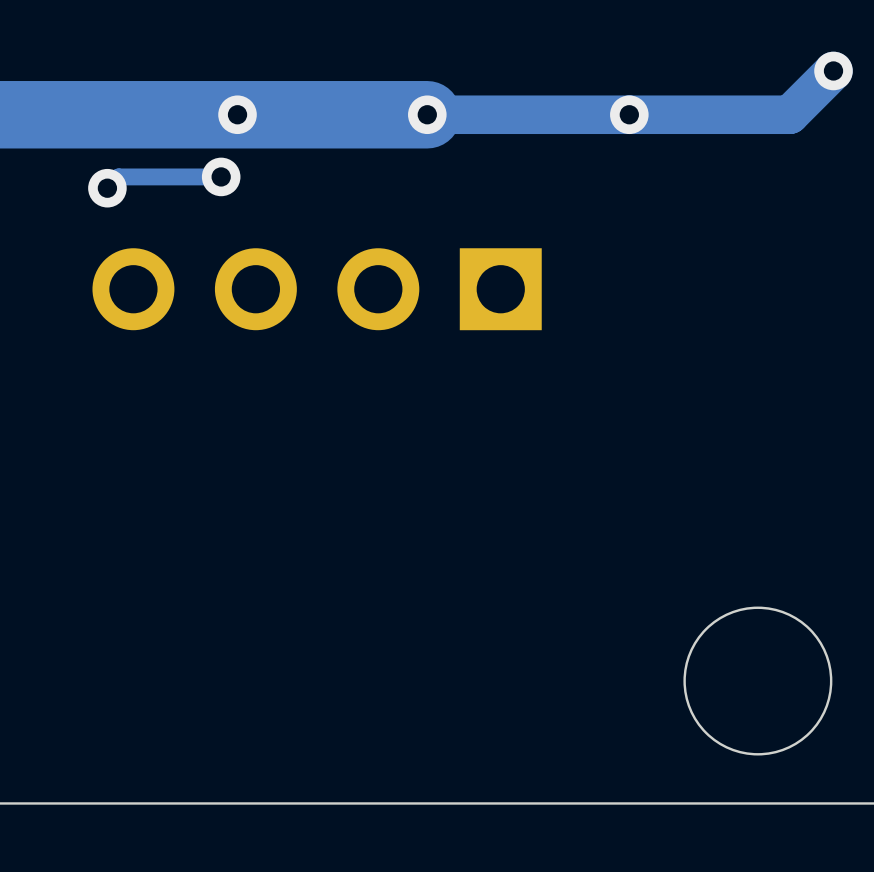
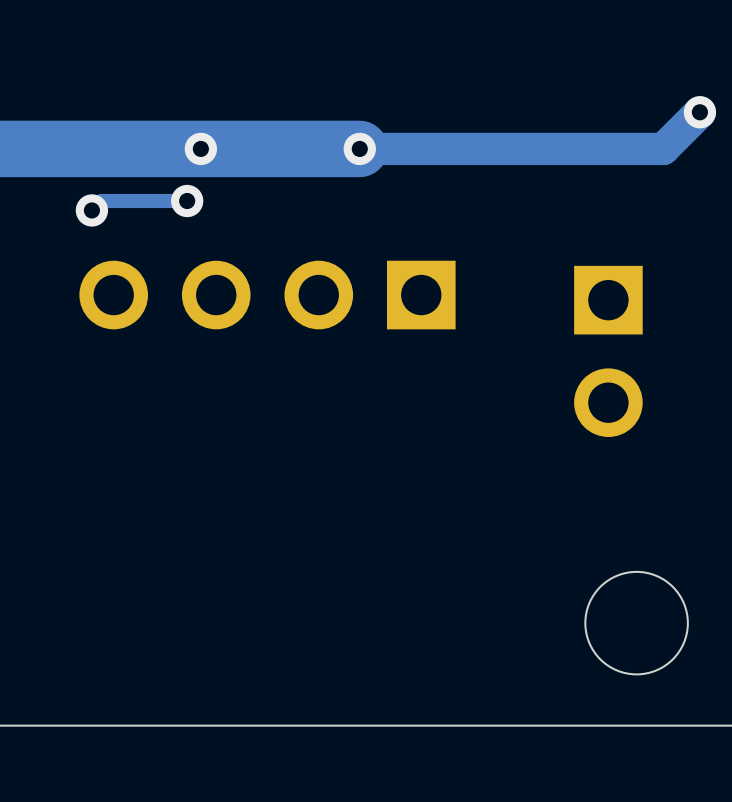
via: (629, 114) -> none
part: none -> (608, 351)
round board edge size: [683, 606, 833, 756] -> [584, 570, 689, 676]

